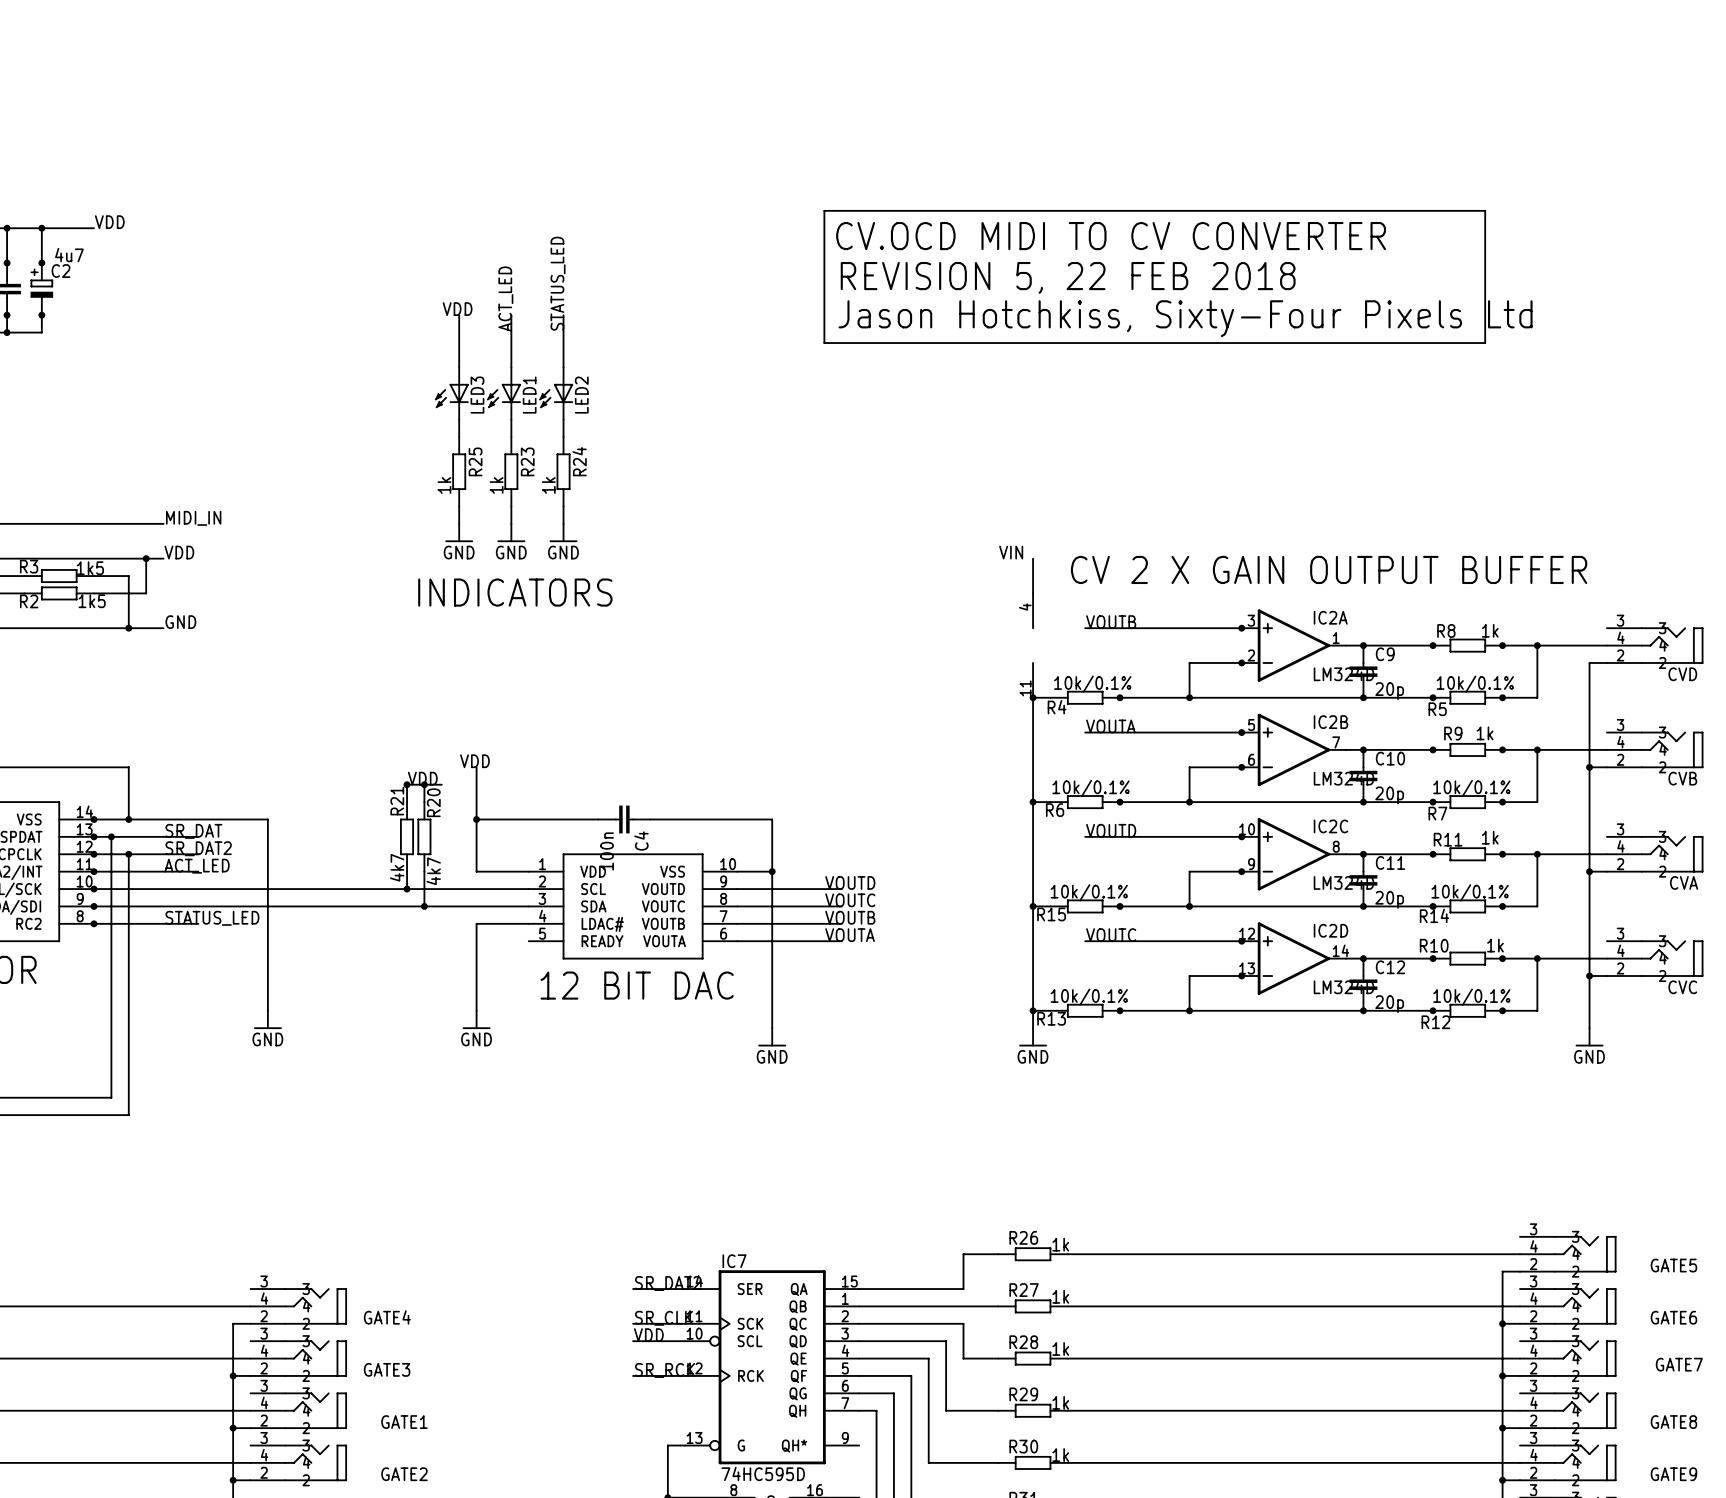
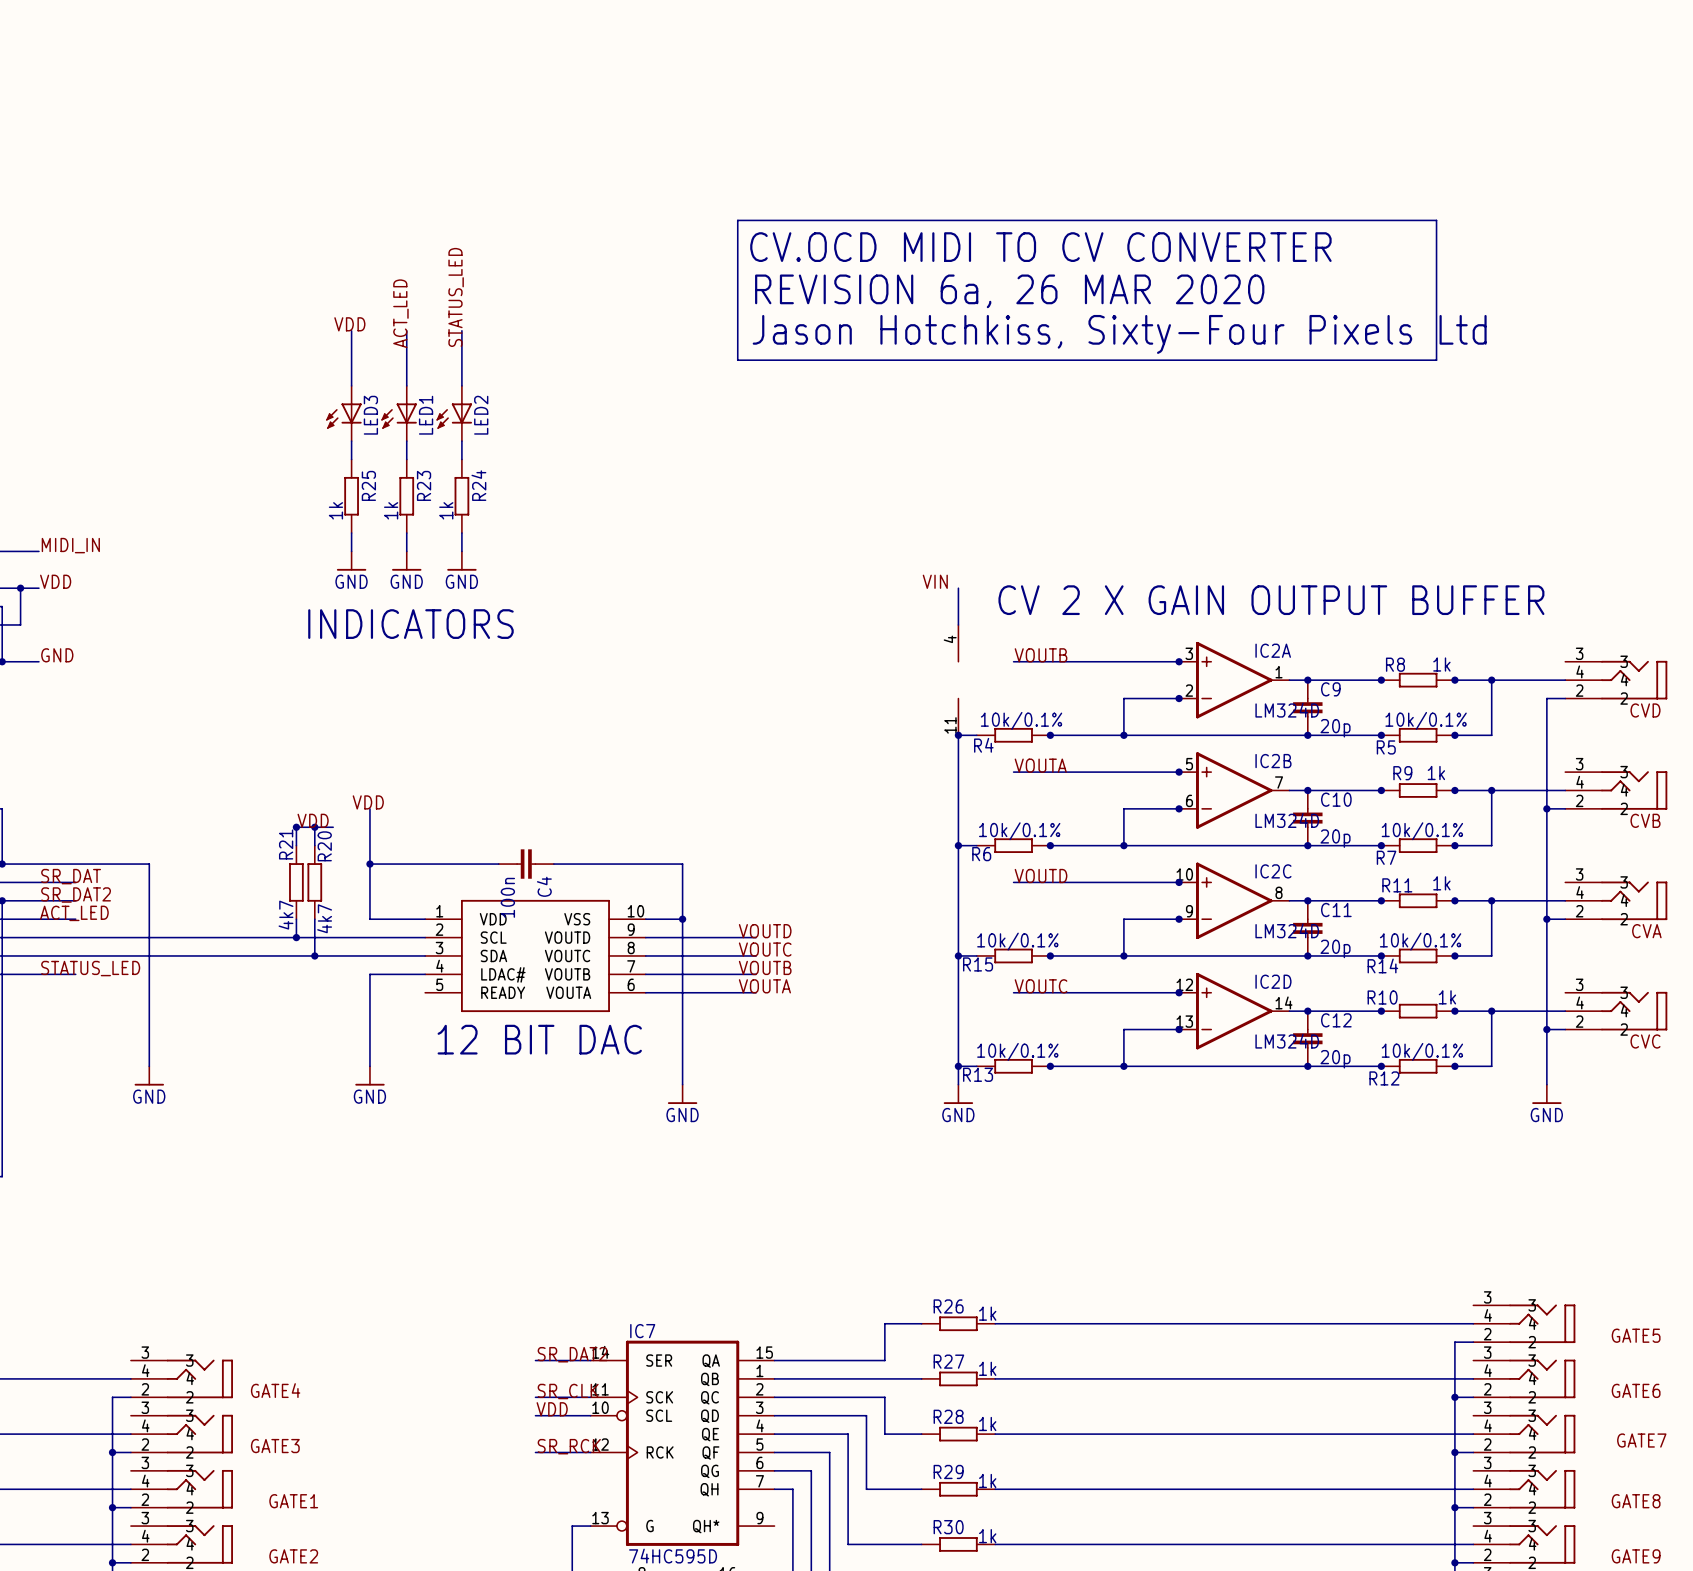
text: REVISION 5, 22 FEB 2018 (1068, 277) -> REVISION 6a, 26 MAR 2020 (1009, 291)

